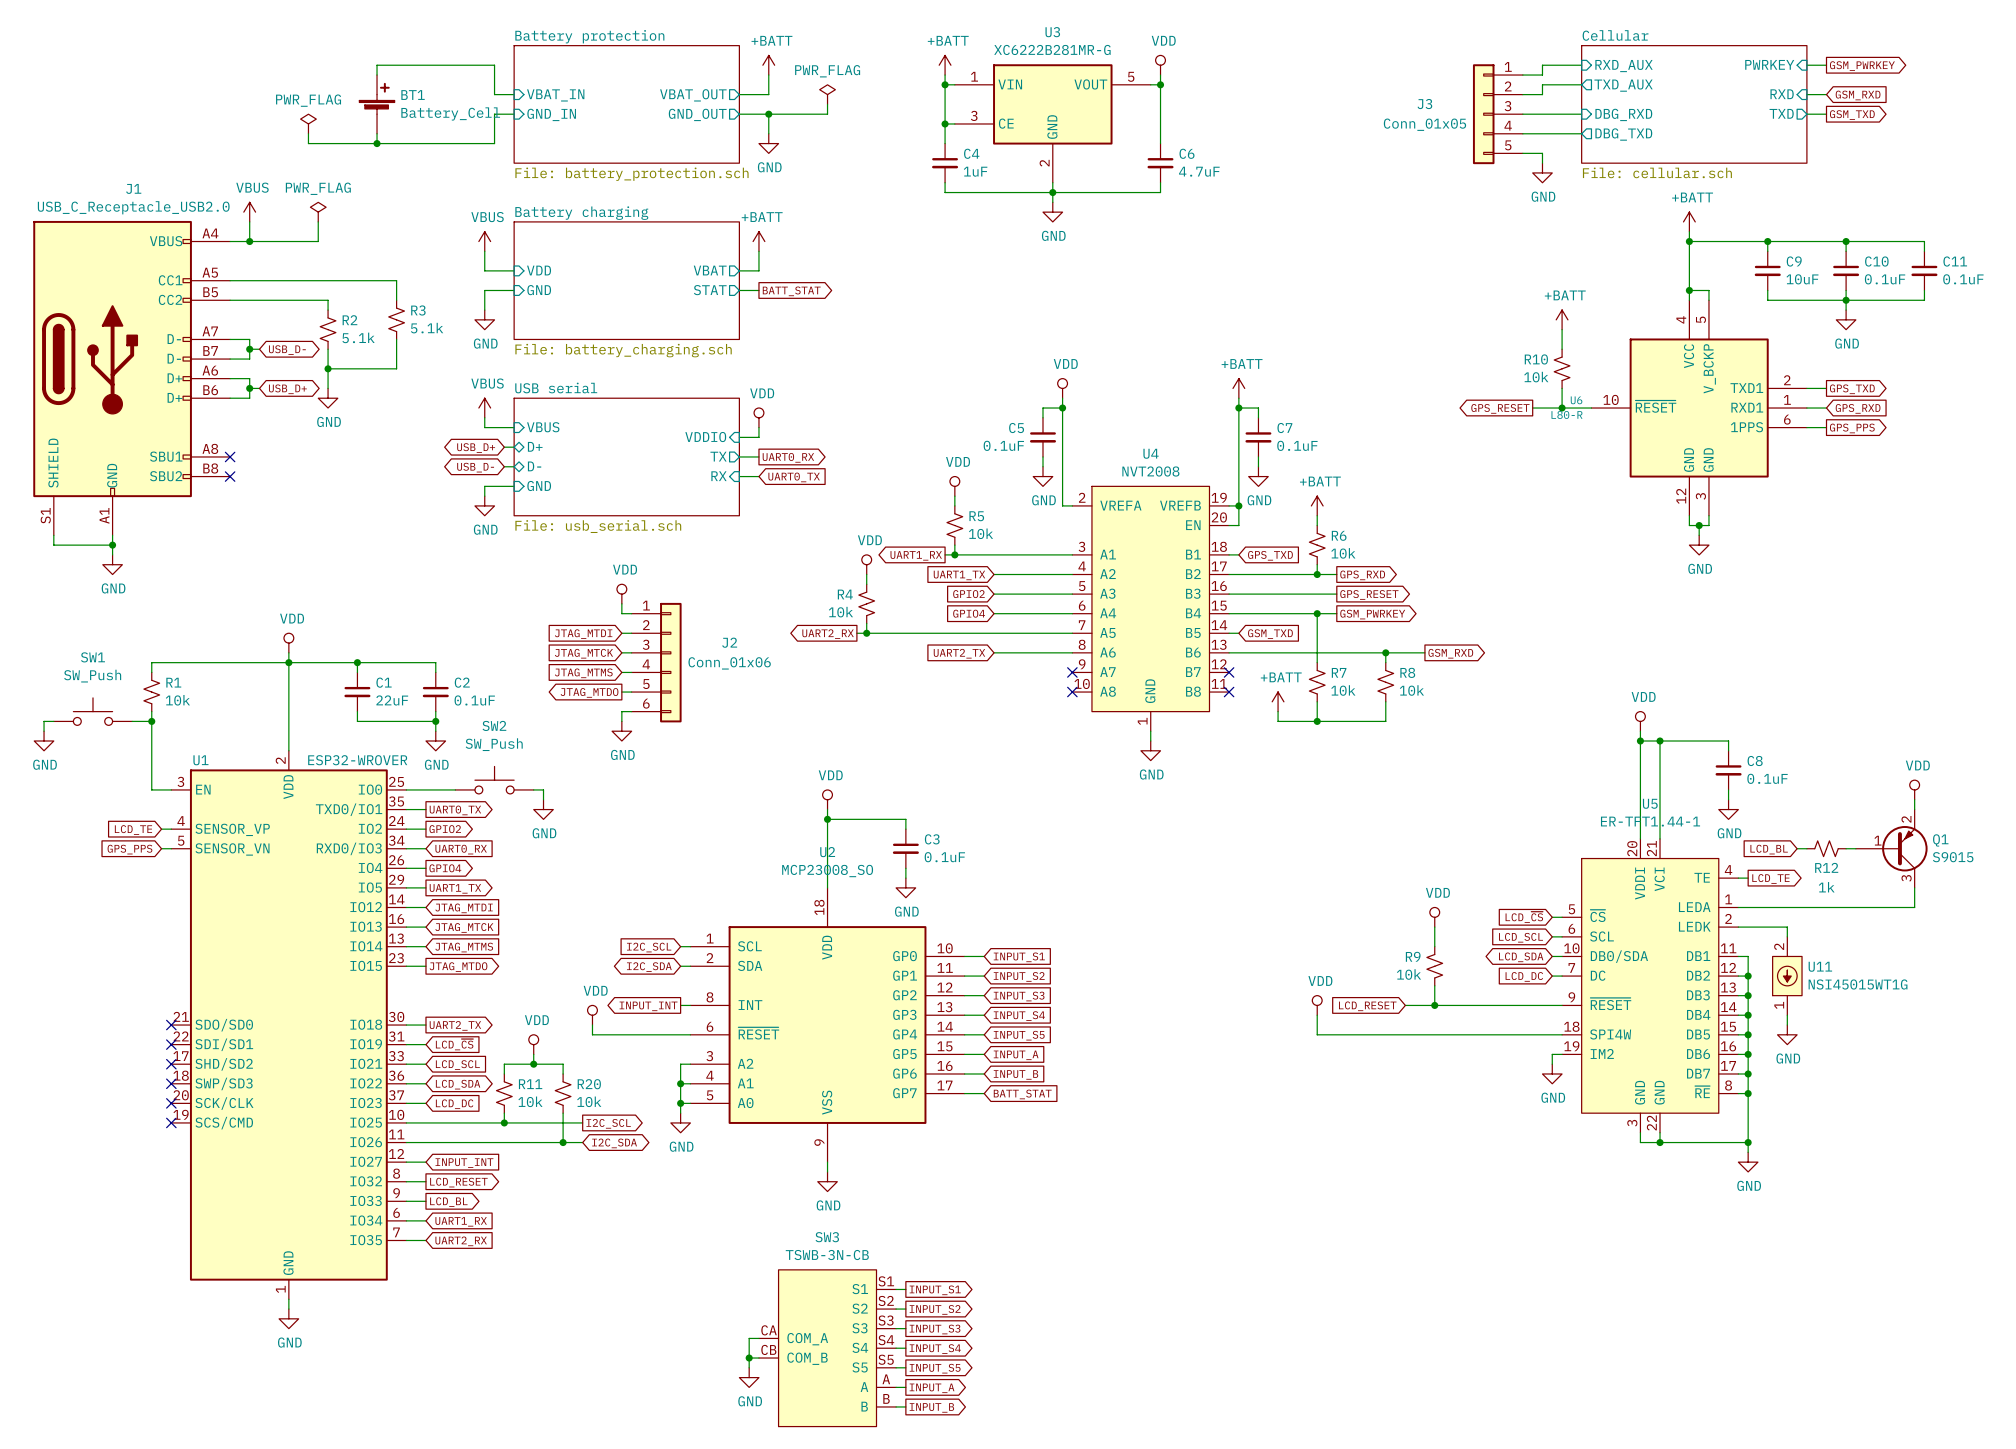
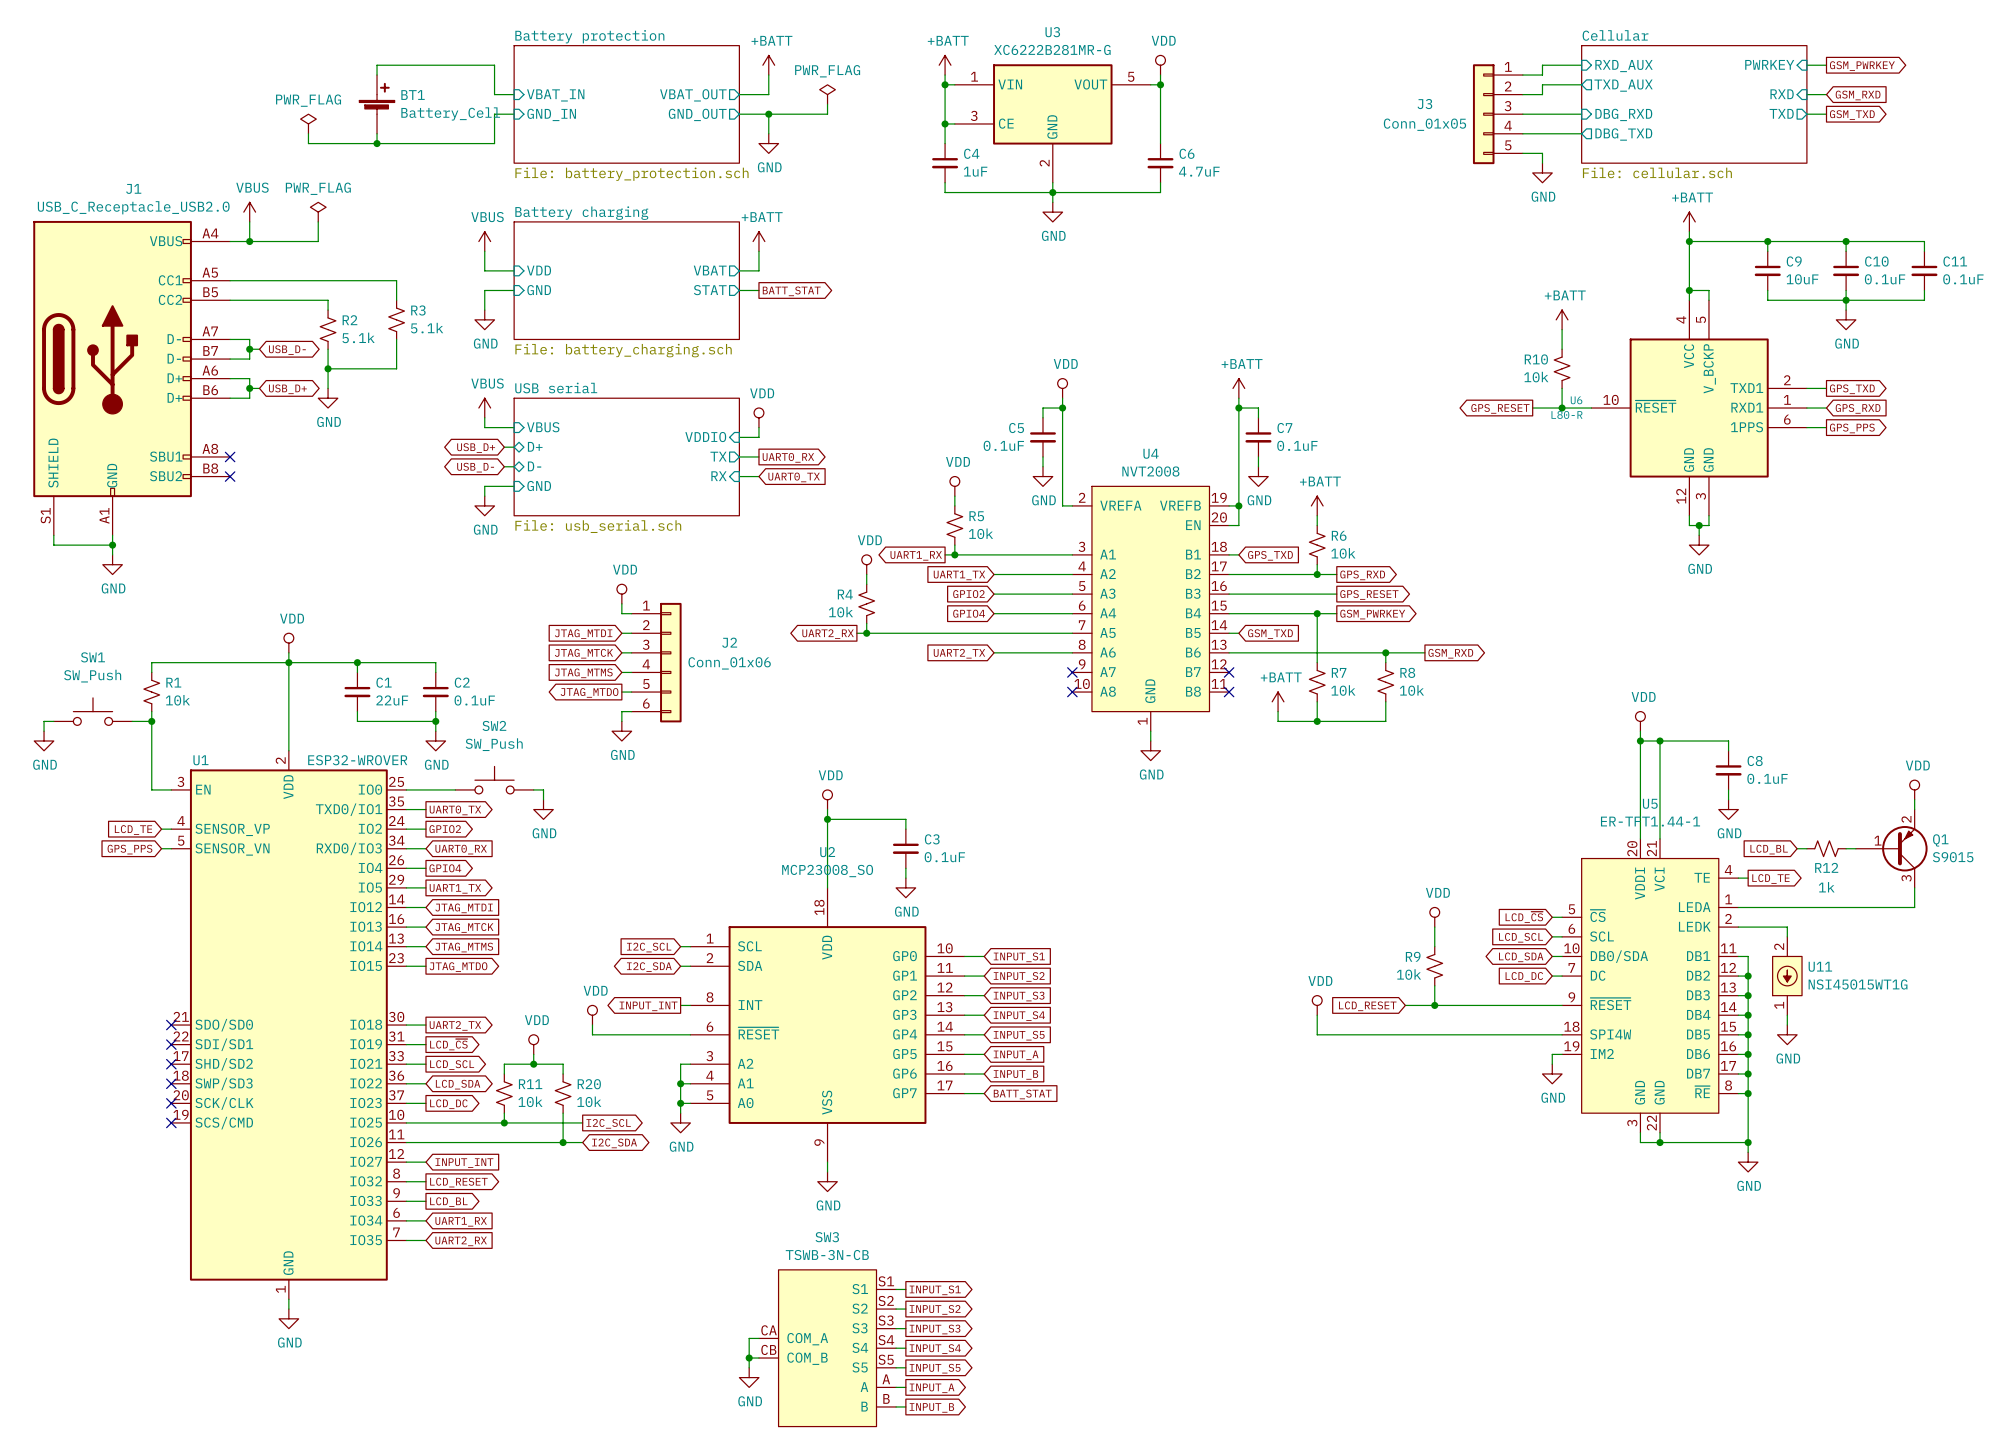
global label shape: input (454, 1044) -> output (448, 1044)
global label shape: input (457, 1065) -> output (452, 1065)
global label shape: input (454, 1104) -> output (448, 1104)

